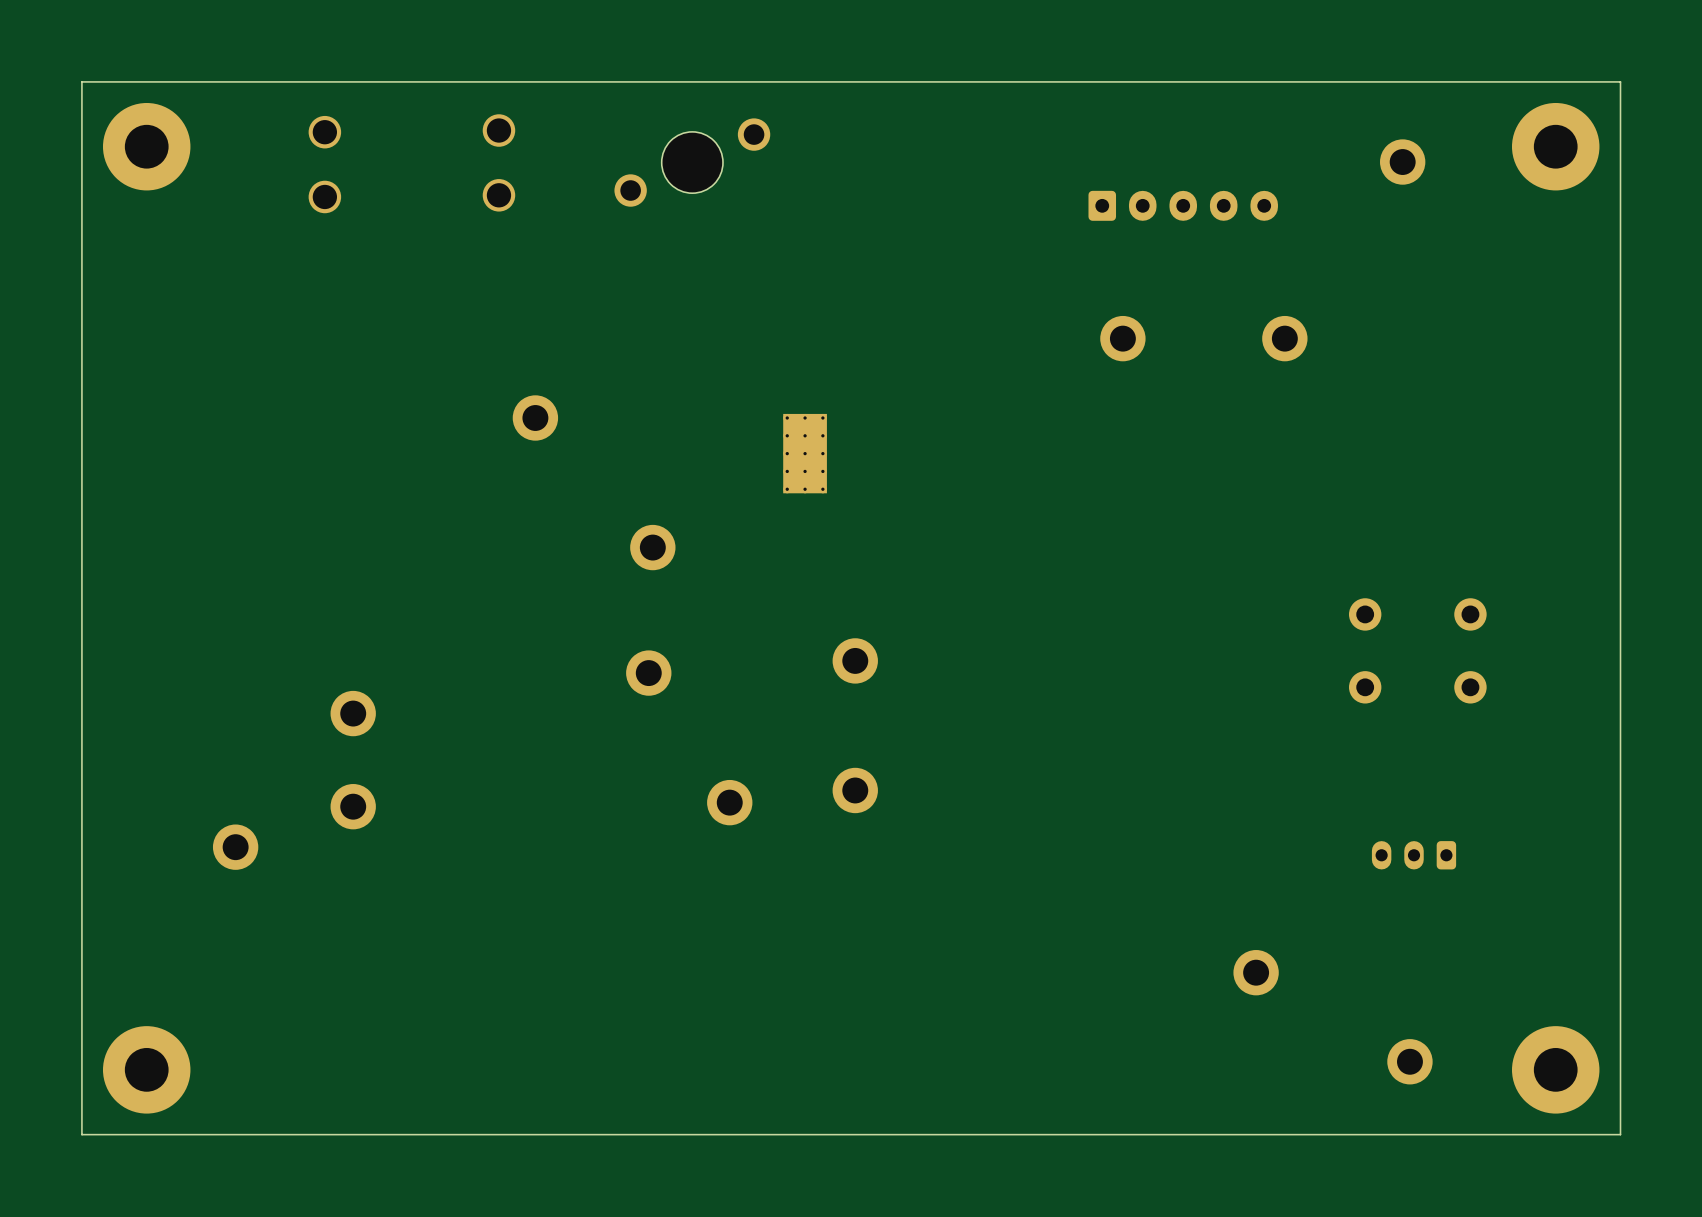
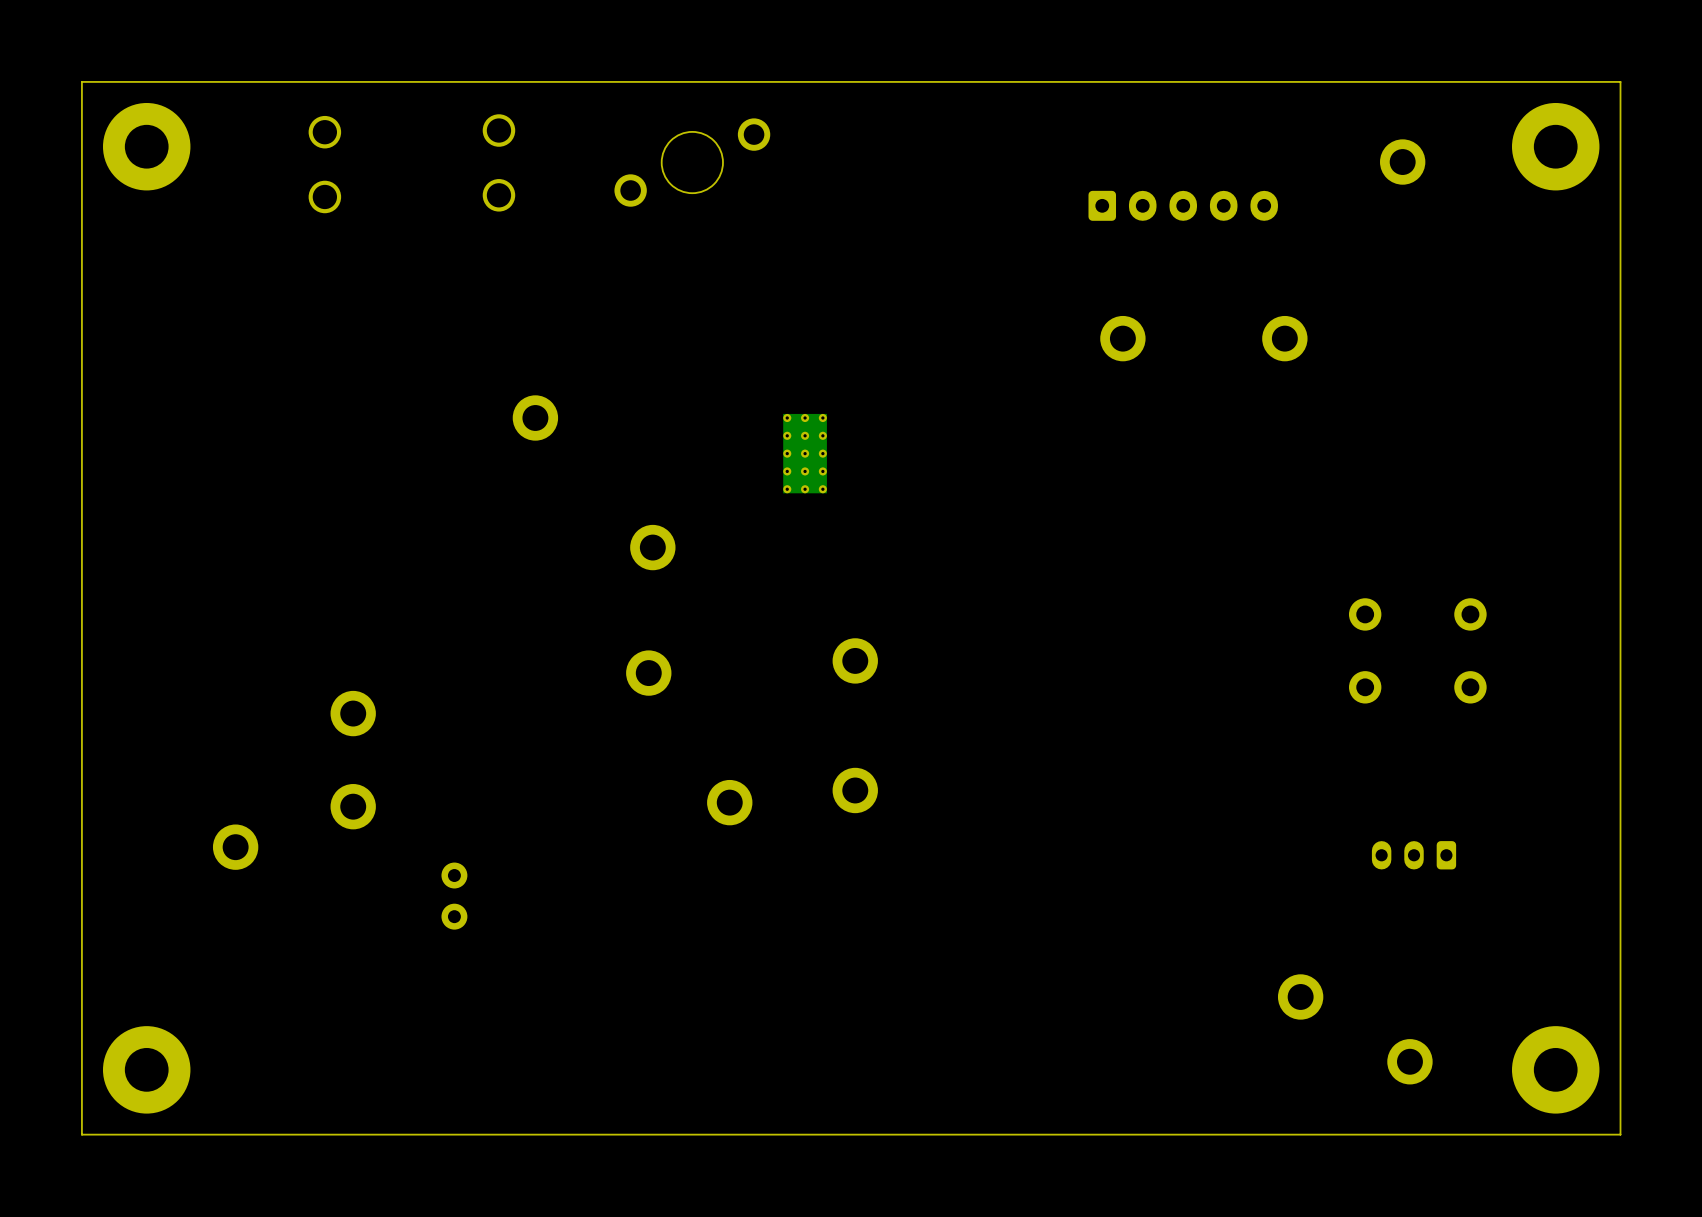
part: none -> (454, 896)
part position: (1256, 972) -> (1300, 996)

